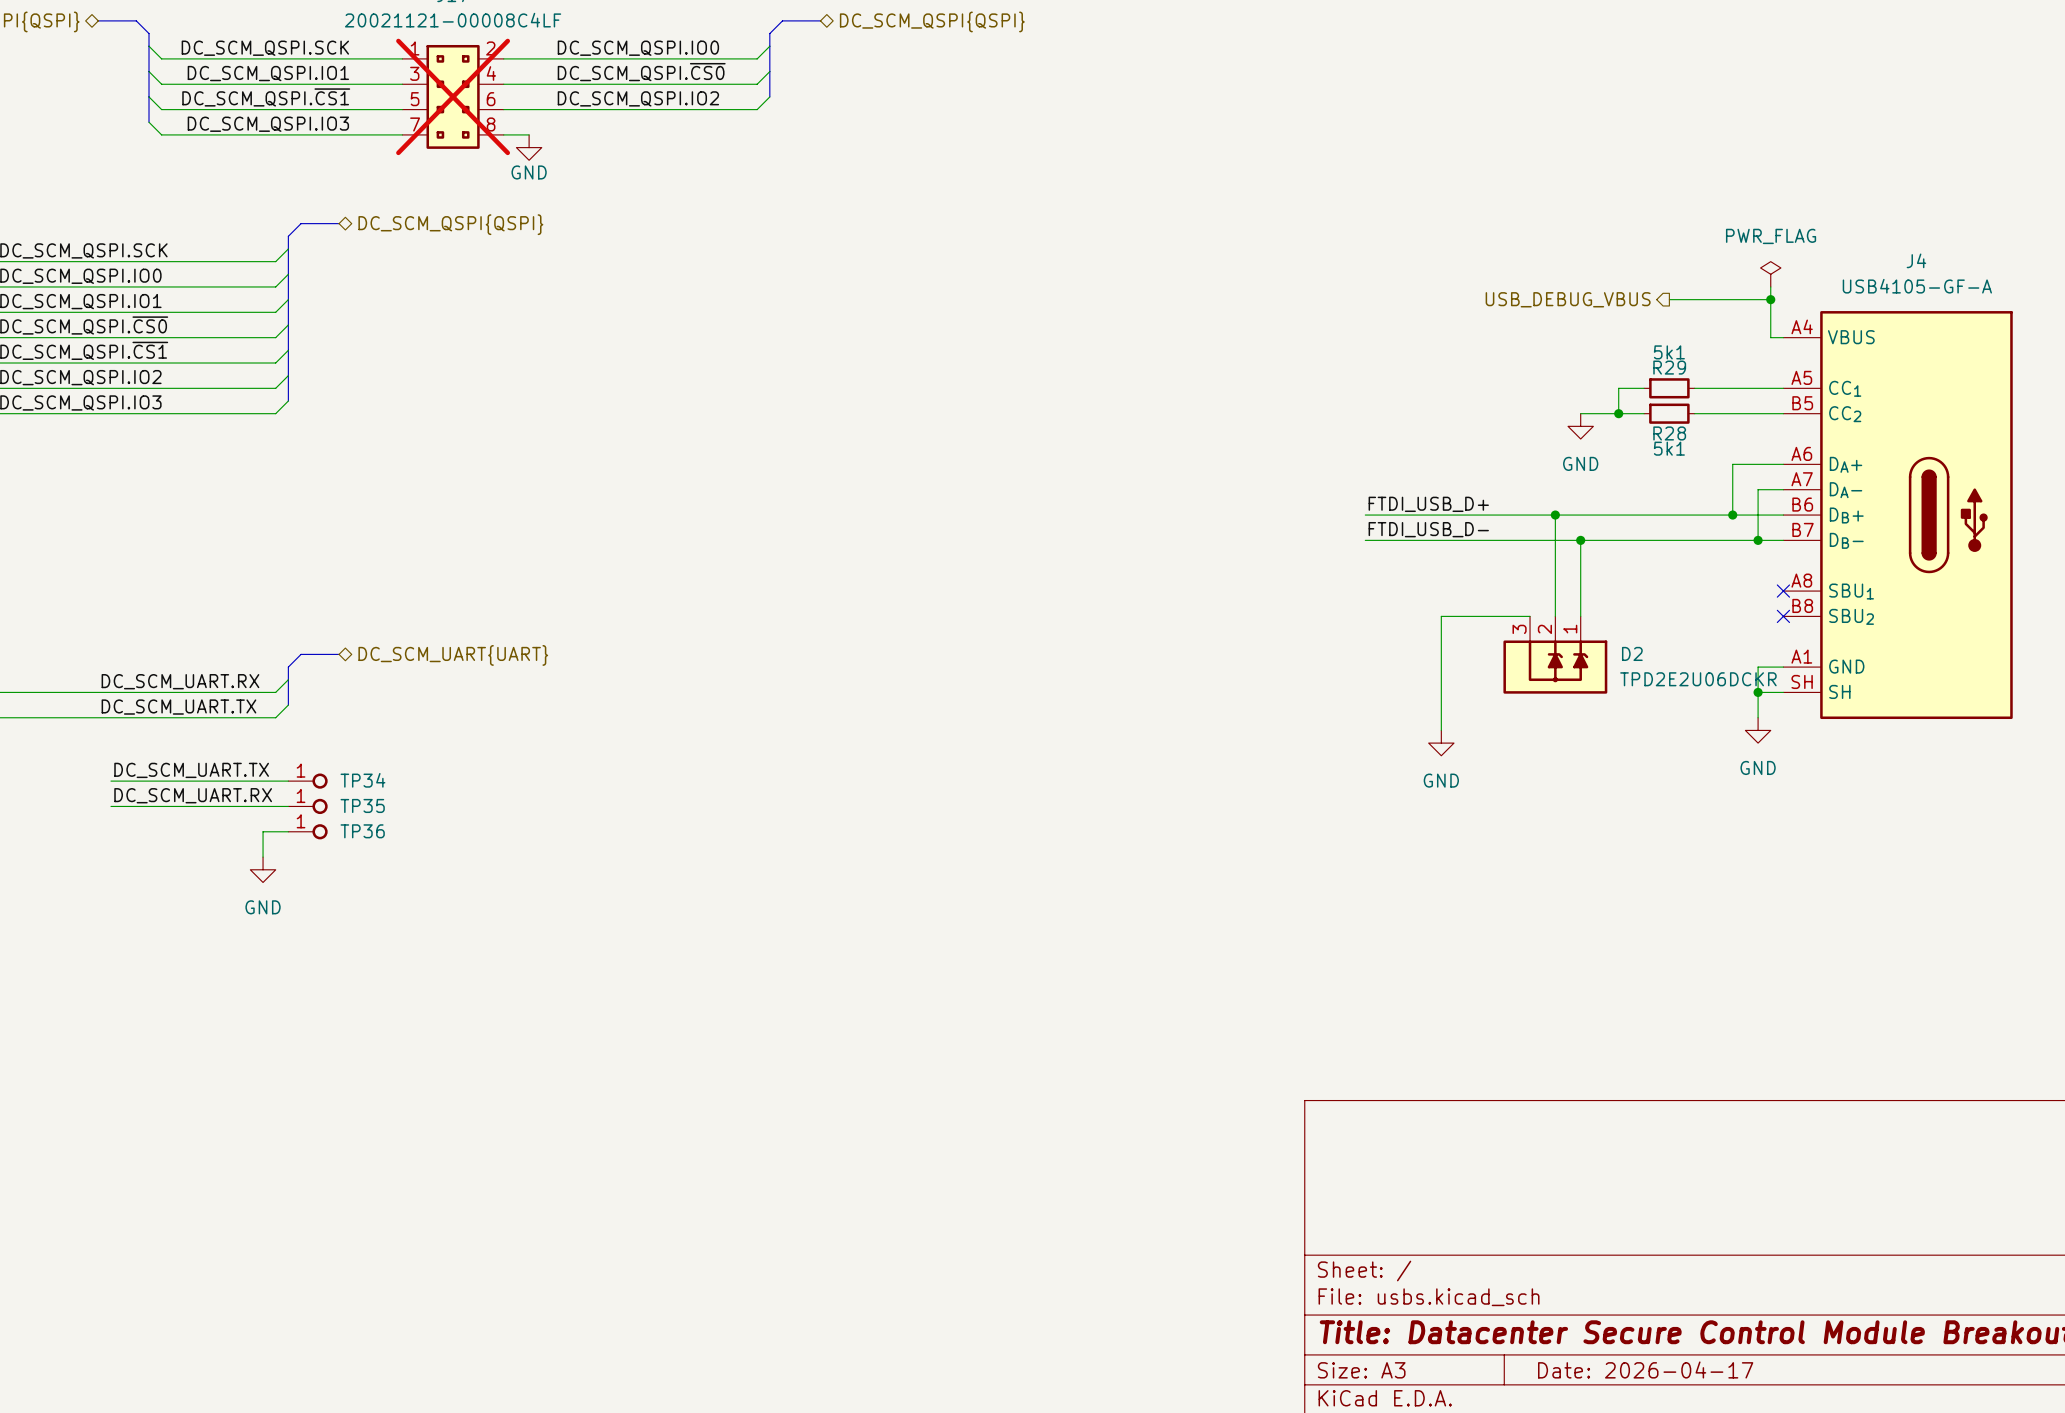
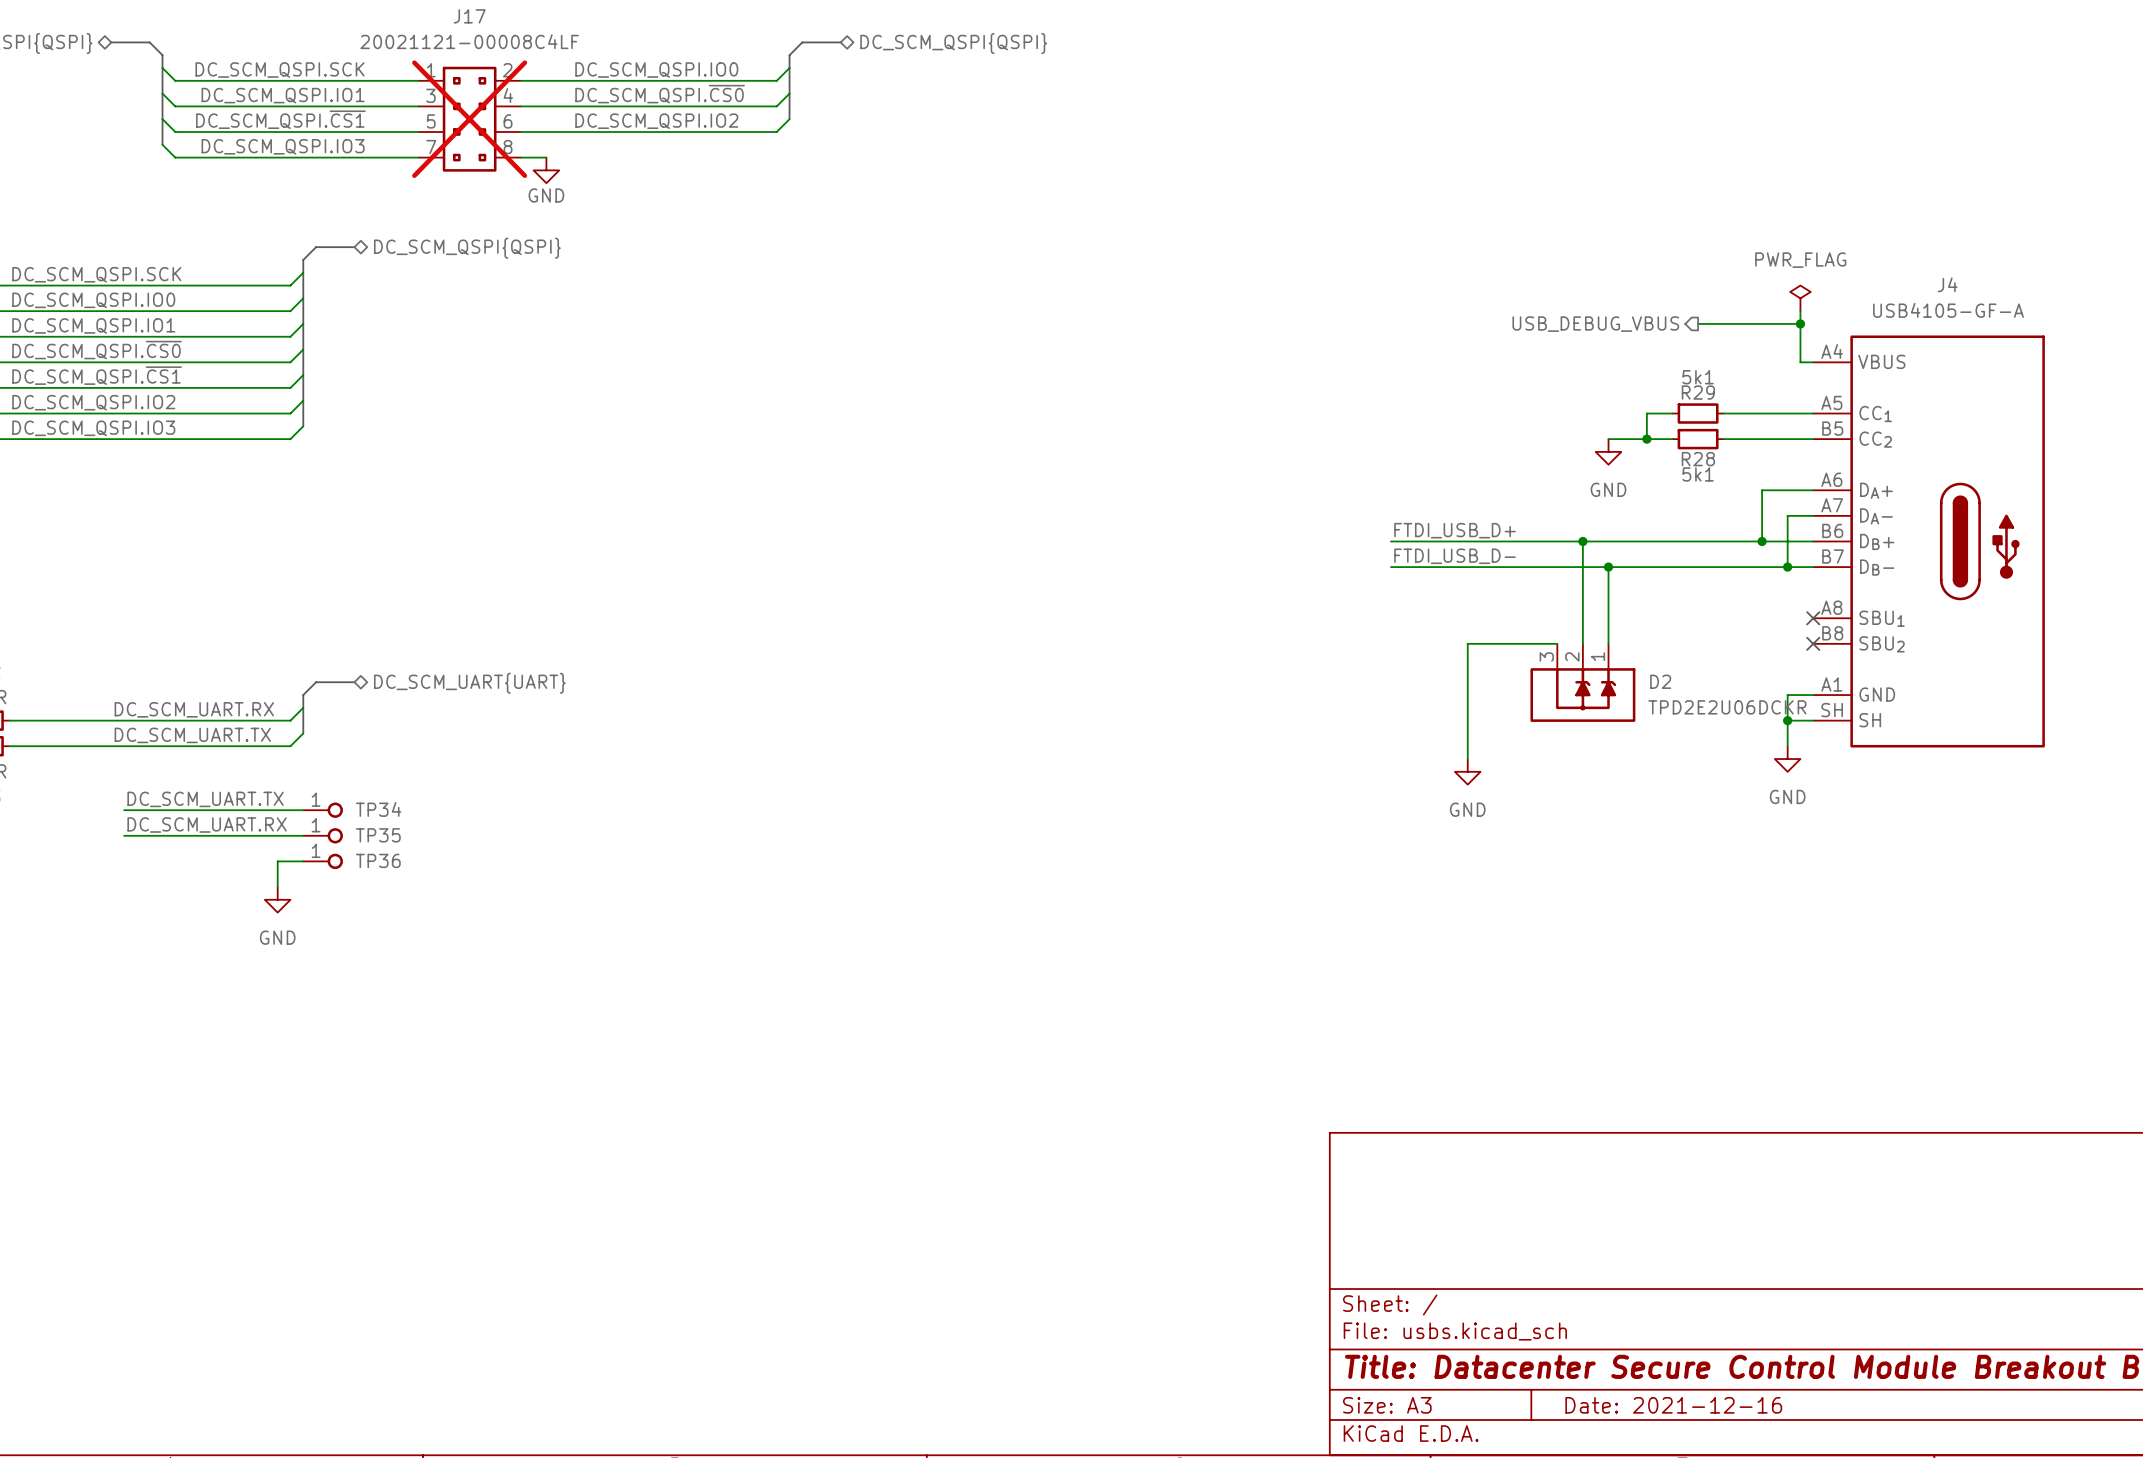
title block: Date: 2026-04-17 (1645, 1369) -> Date: 2021-12-16 (1673, 1405)

